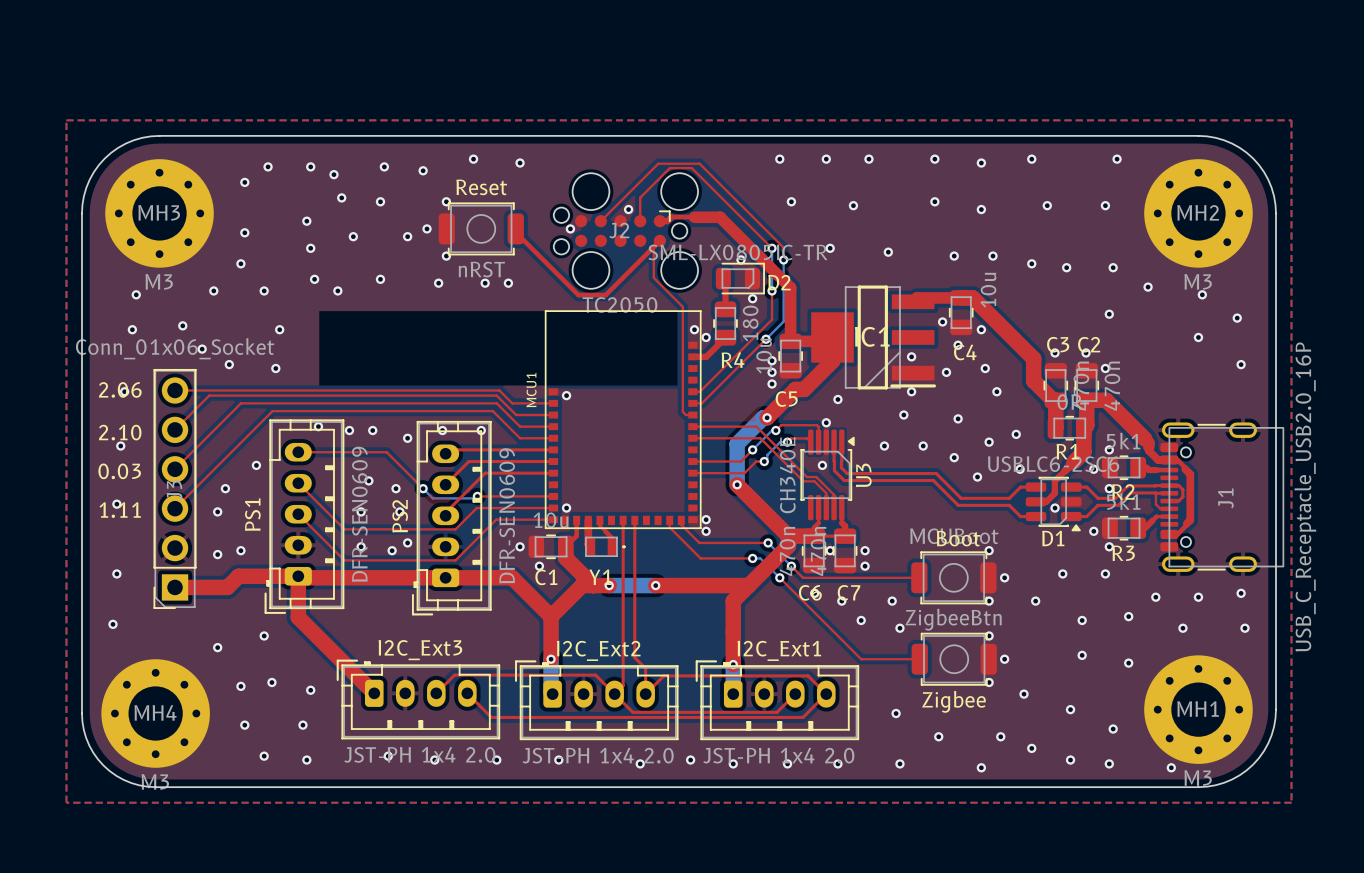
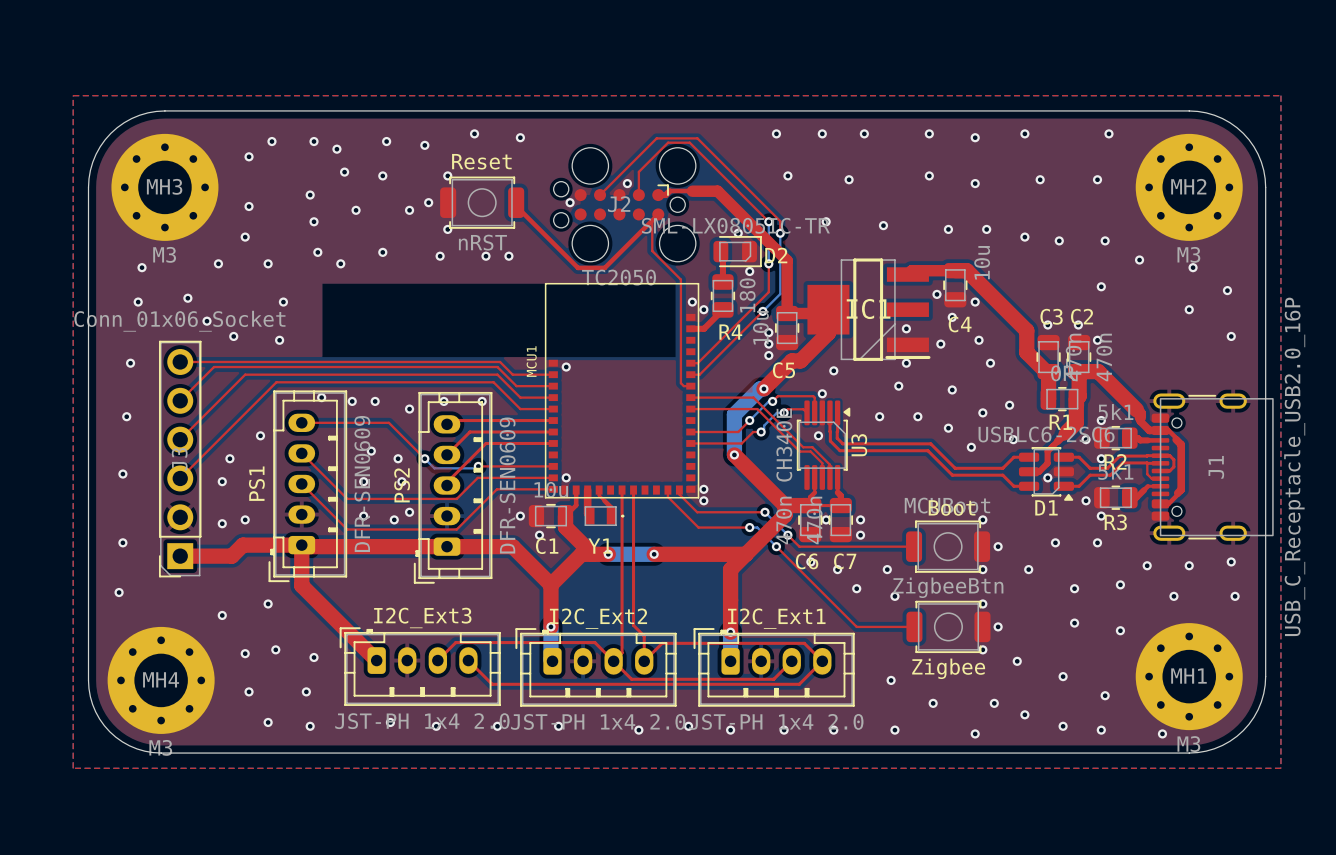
text: 2.06 (120, 389) -> none
text: 2.10 (120, 432) -> none
text: 0.03 (119, 471) -> none
text: 1.11 (120, 510) -> none

